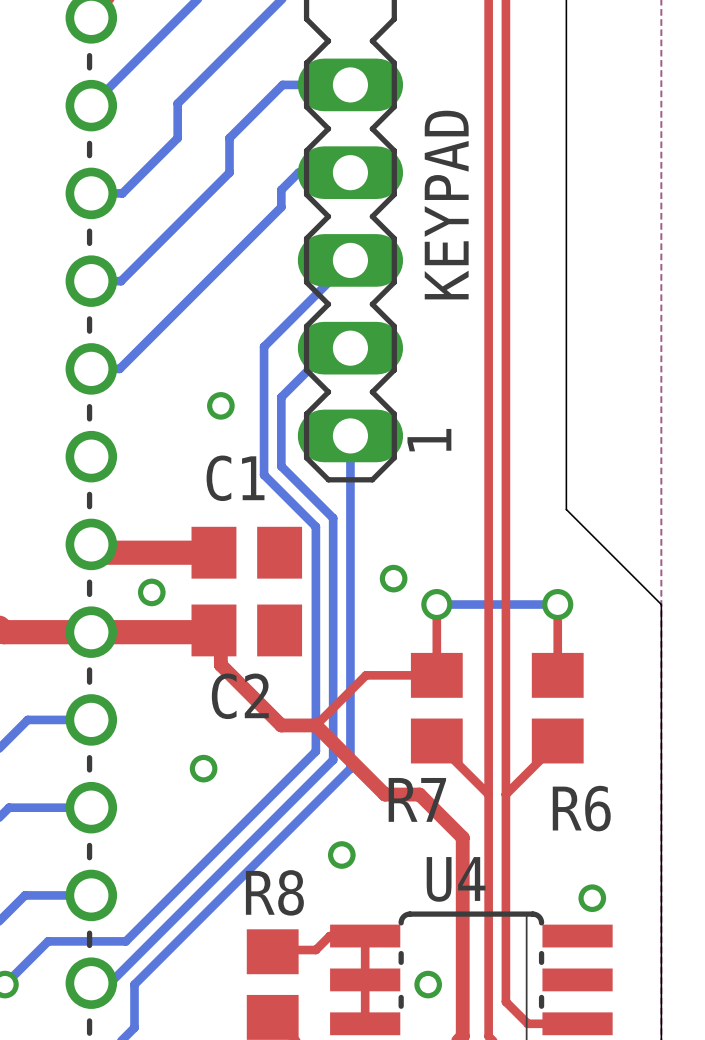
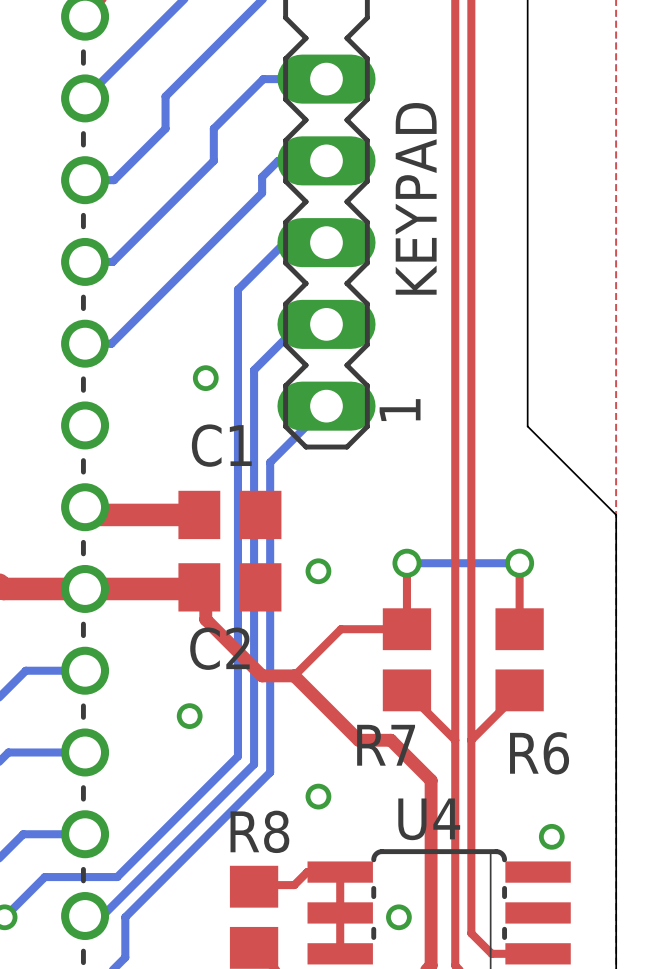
bottom track: (350, 260) (264, 346) (264, 474) (315, 526) (315, 751) (255, 811) -> (326, 242) (284, 242) (237, 289) (237, 756)
bottom track: (330, 348) (281, 397) (281, 466) (333, 518) (333, 760) (272, 820) -> (307, 324) (299, 324) (254, 370) (254, 764)
bottom track: (350, 435) (350, 768) (289, 829) -> (326, 406) (270, 462) (270, 772)
board edge: (566, 457) (566, 509) (661, 604) -> (527, 426) (616, 514) (616, 563)
via position: (393, 578) -> (318, 571)
via: (151, 592) -> none

